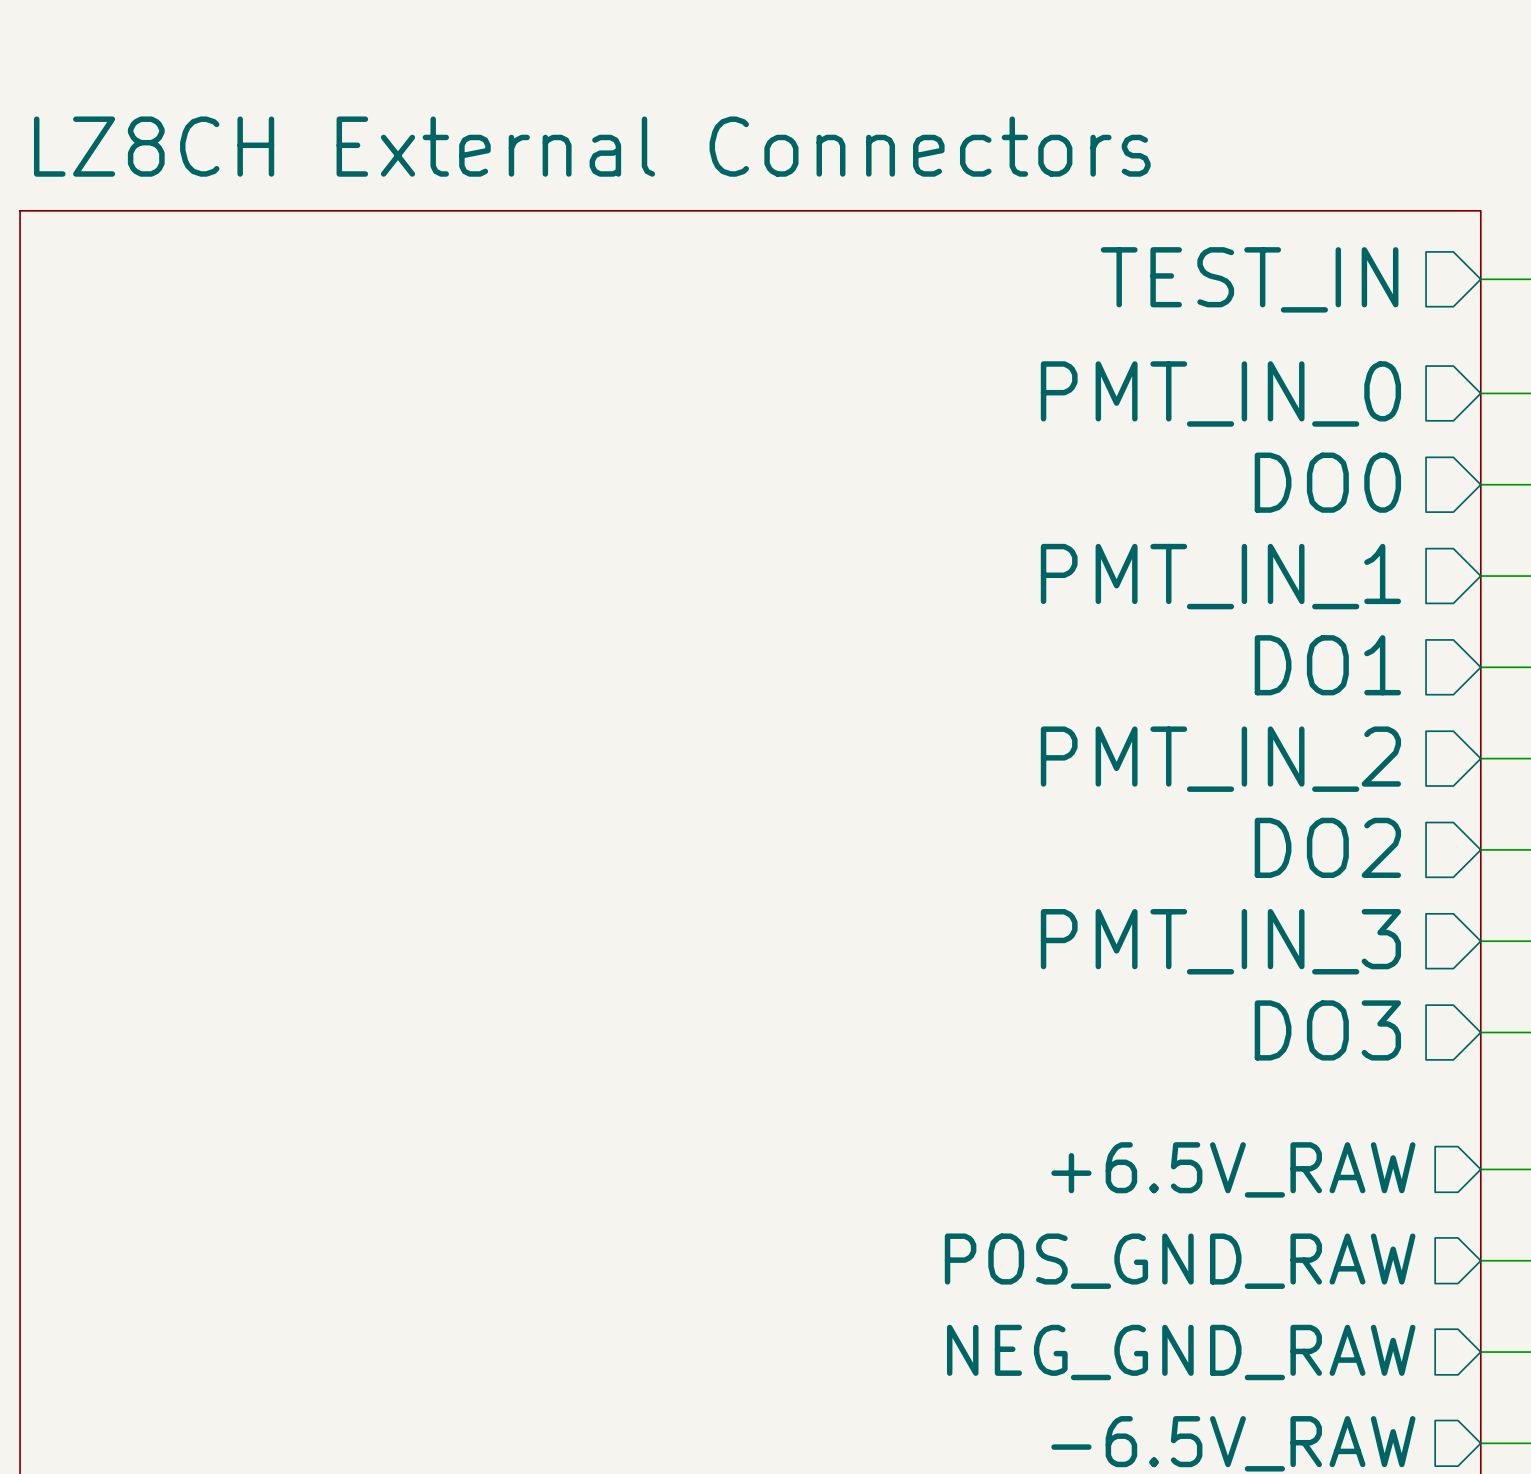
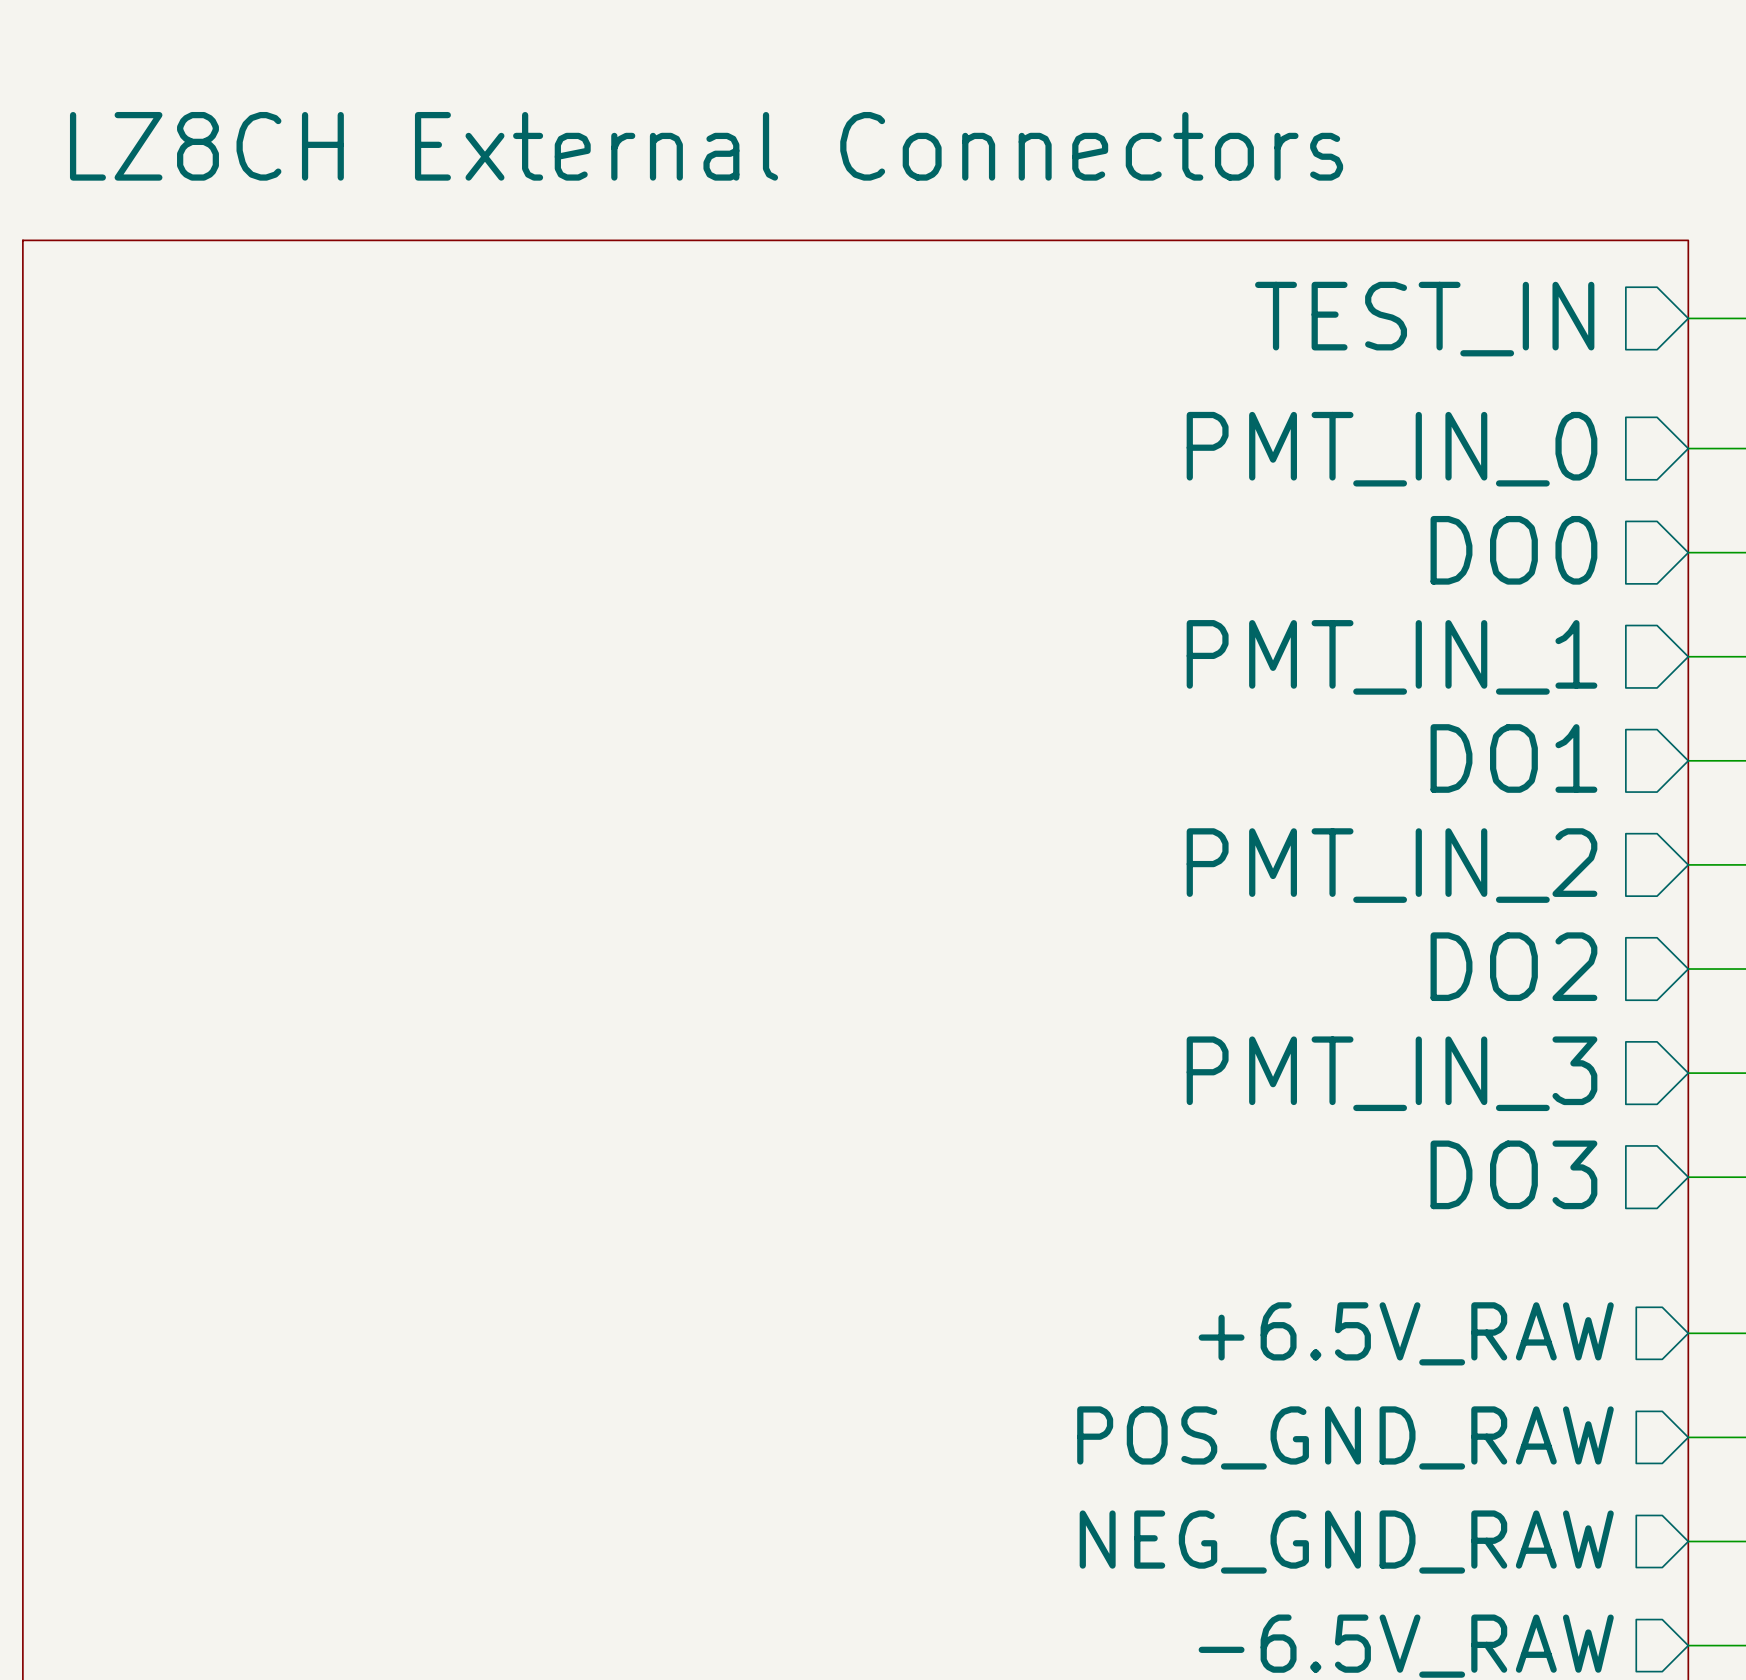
sheet LZ8CH External Connectors name position: LZ8CH External Connectors (592, 146) -> LZ8CH External Connectors (706, 146)

